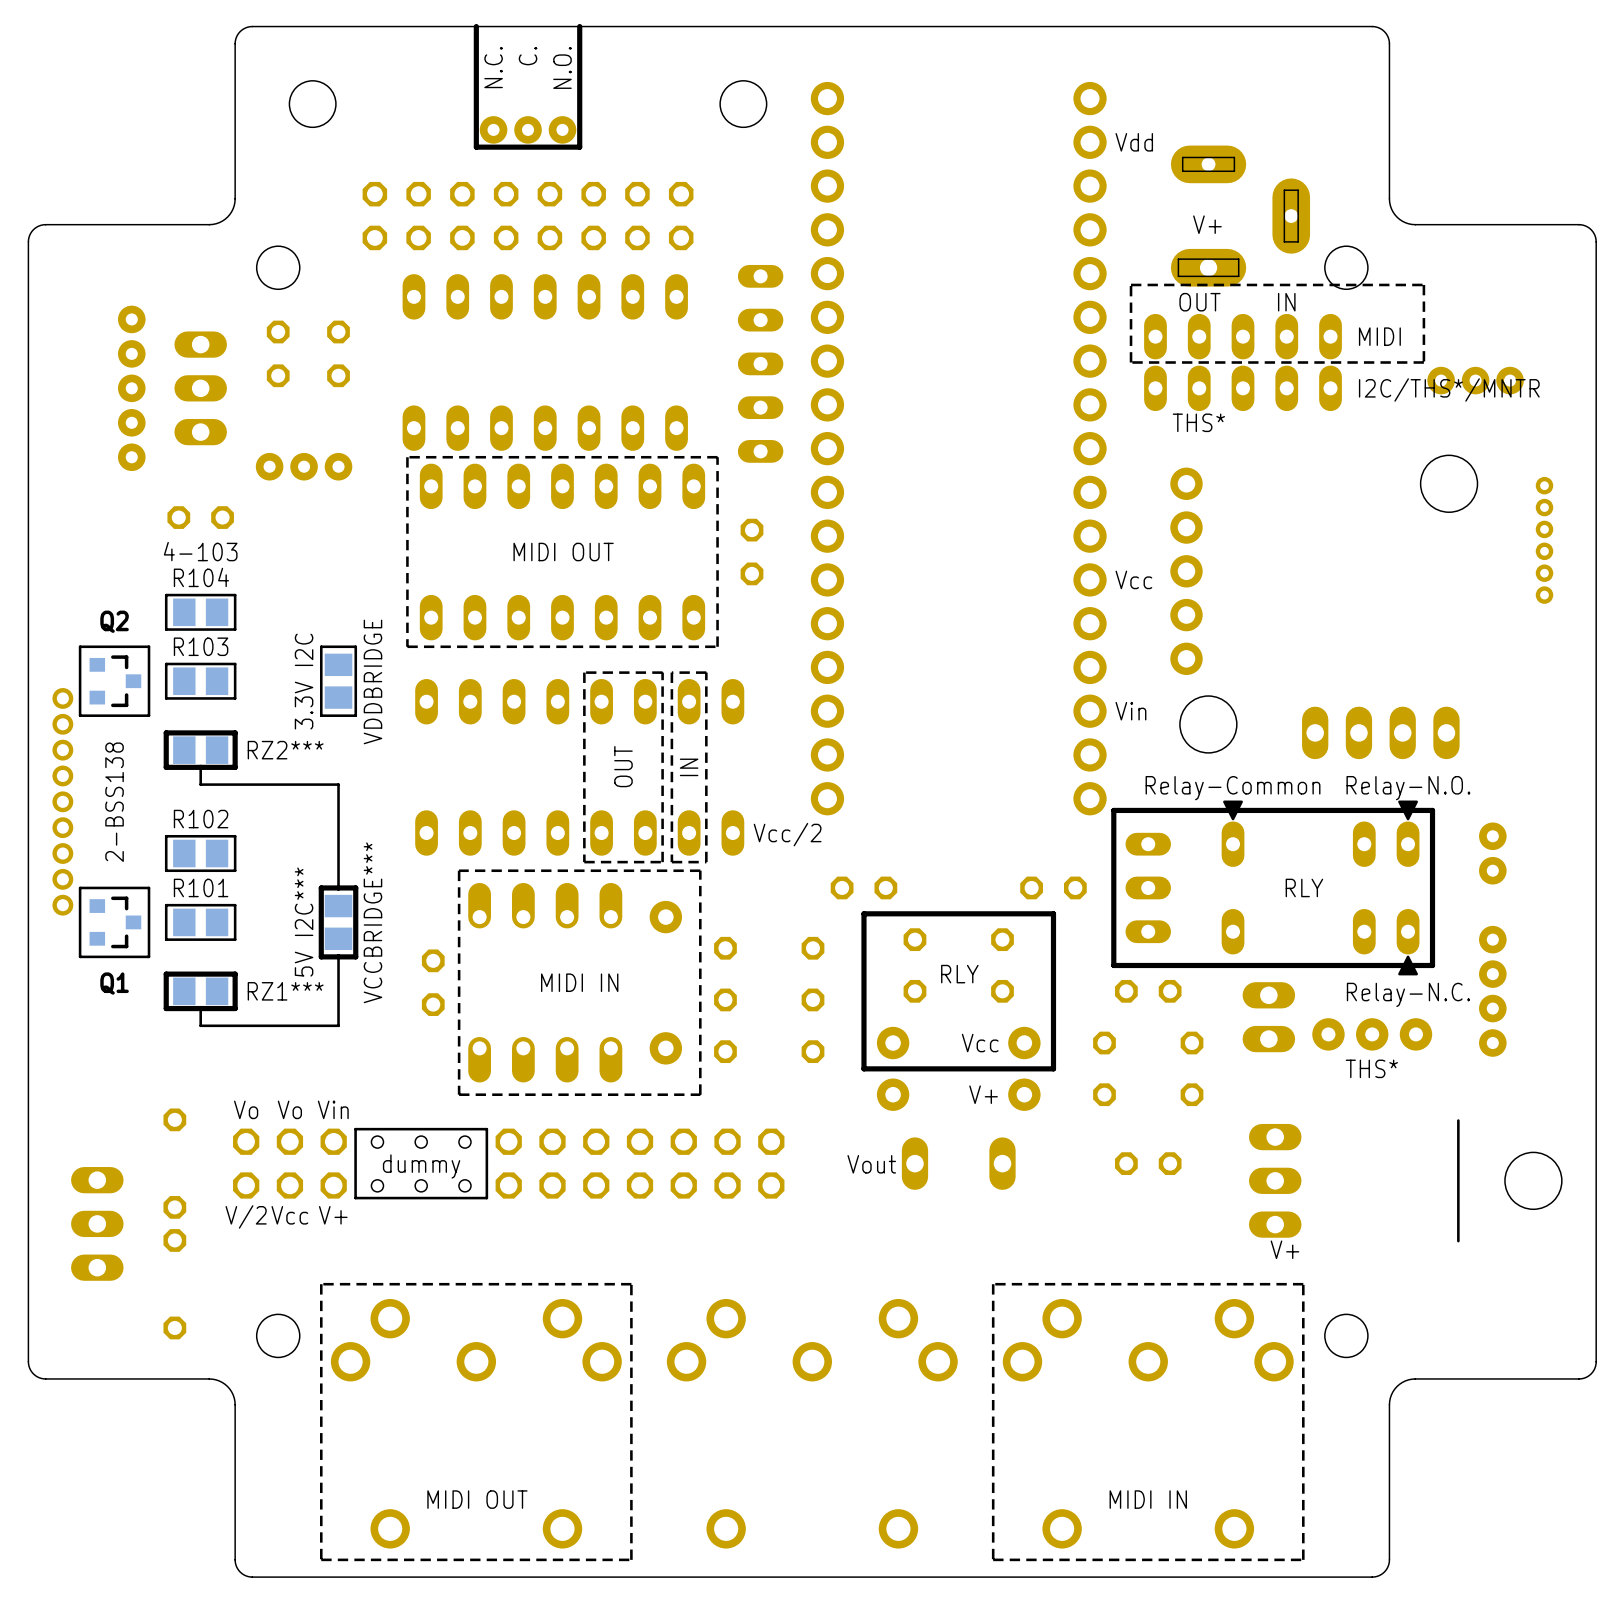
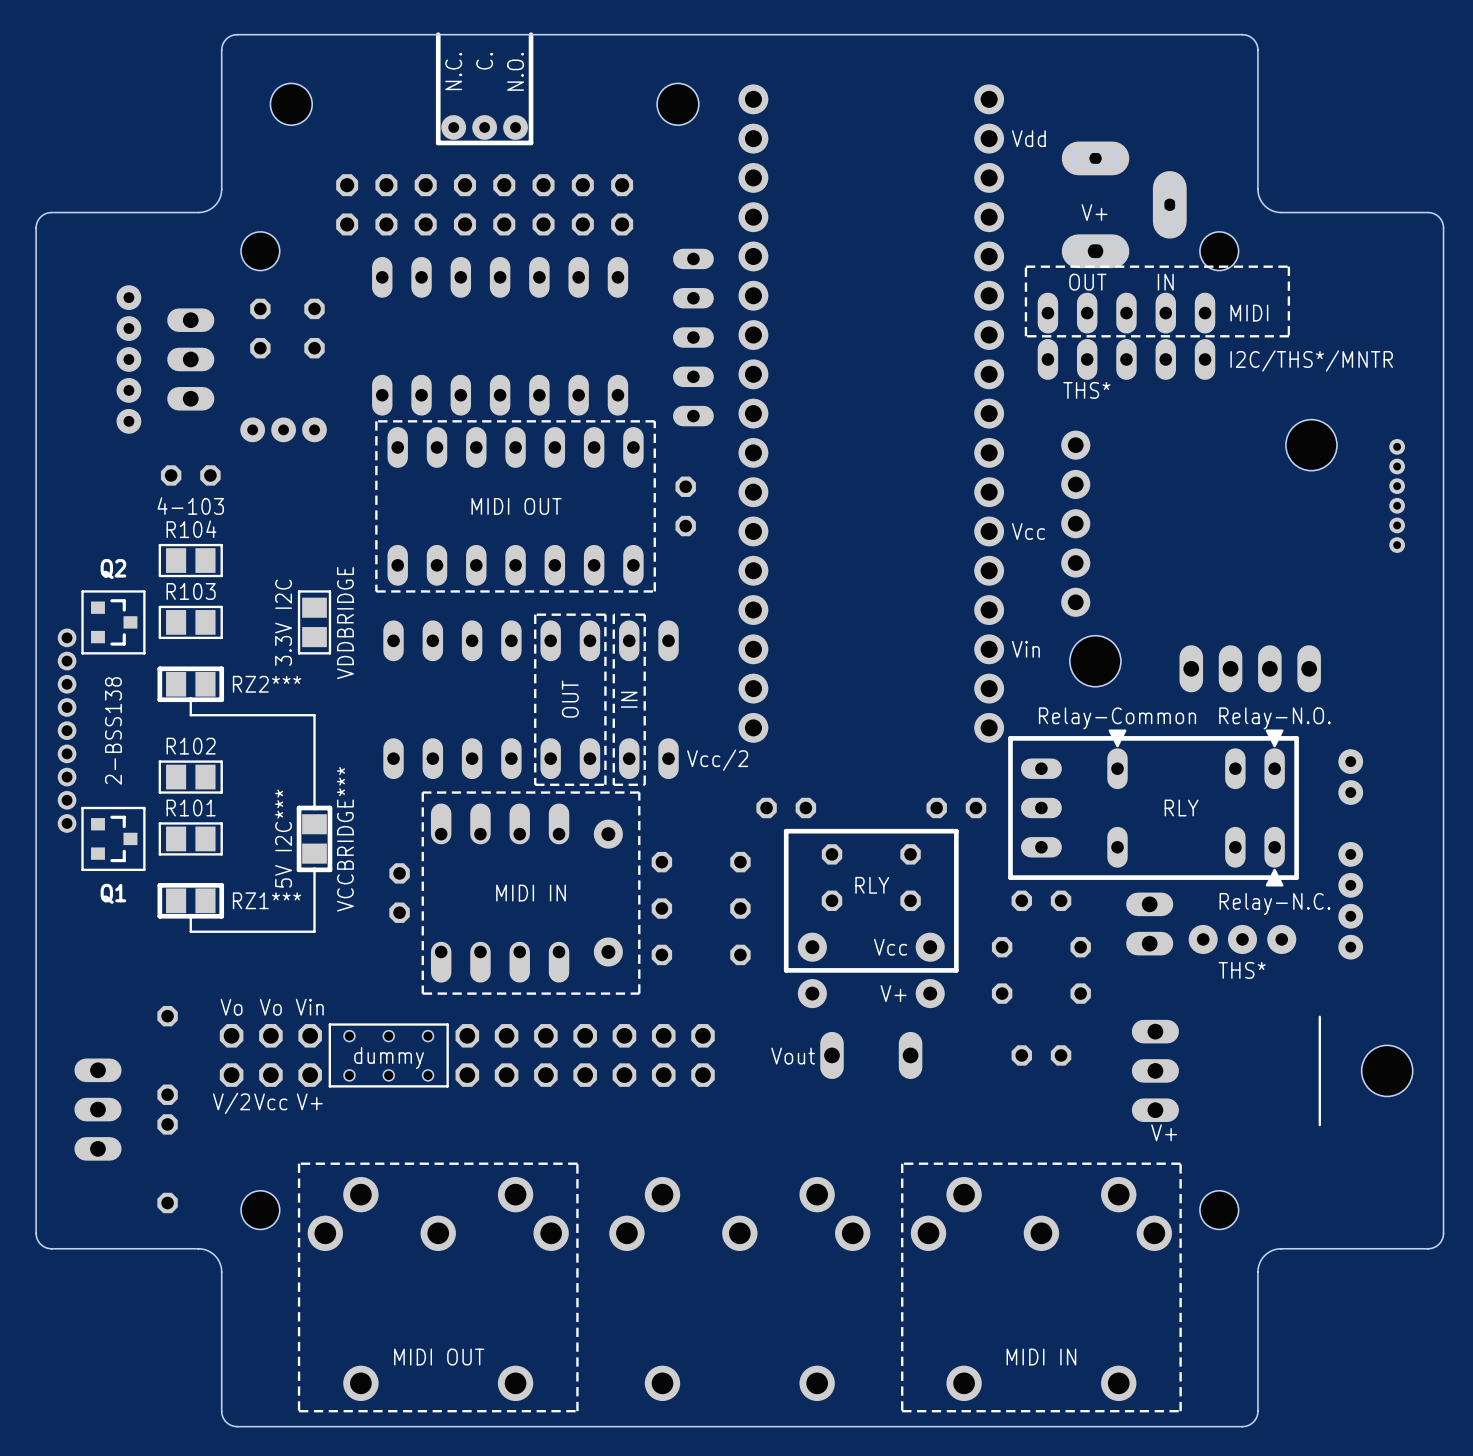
part: (1475, 380) -> none

